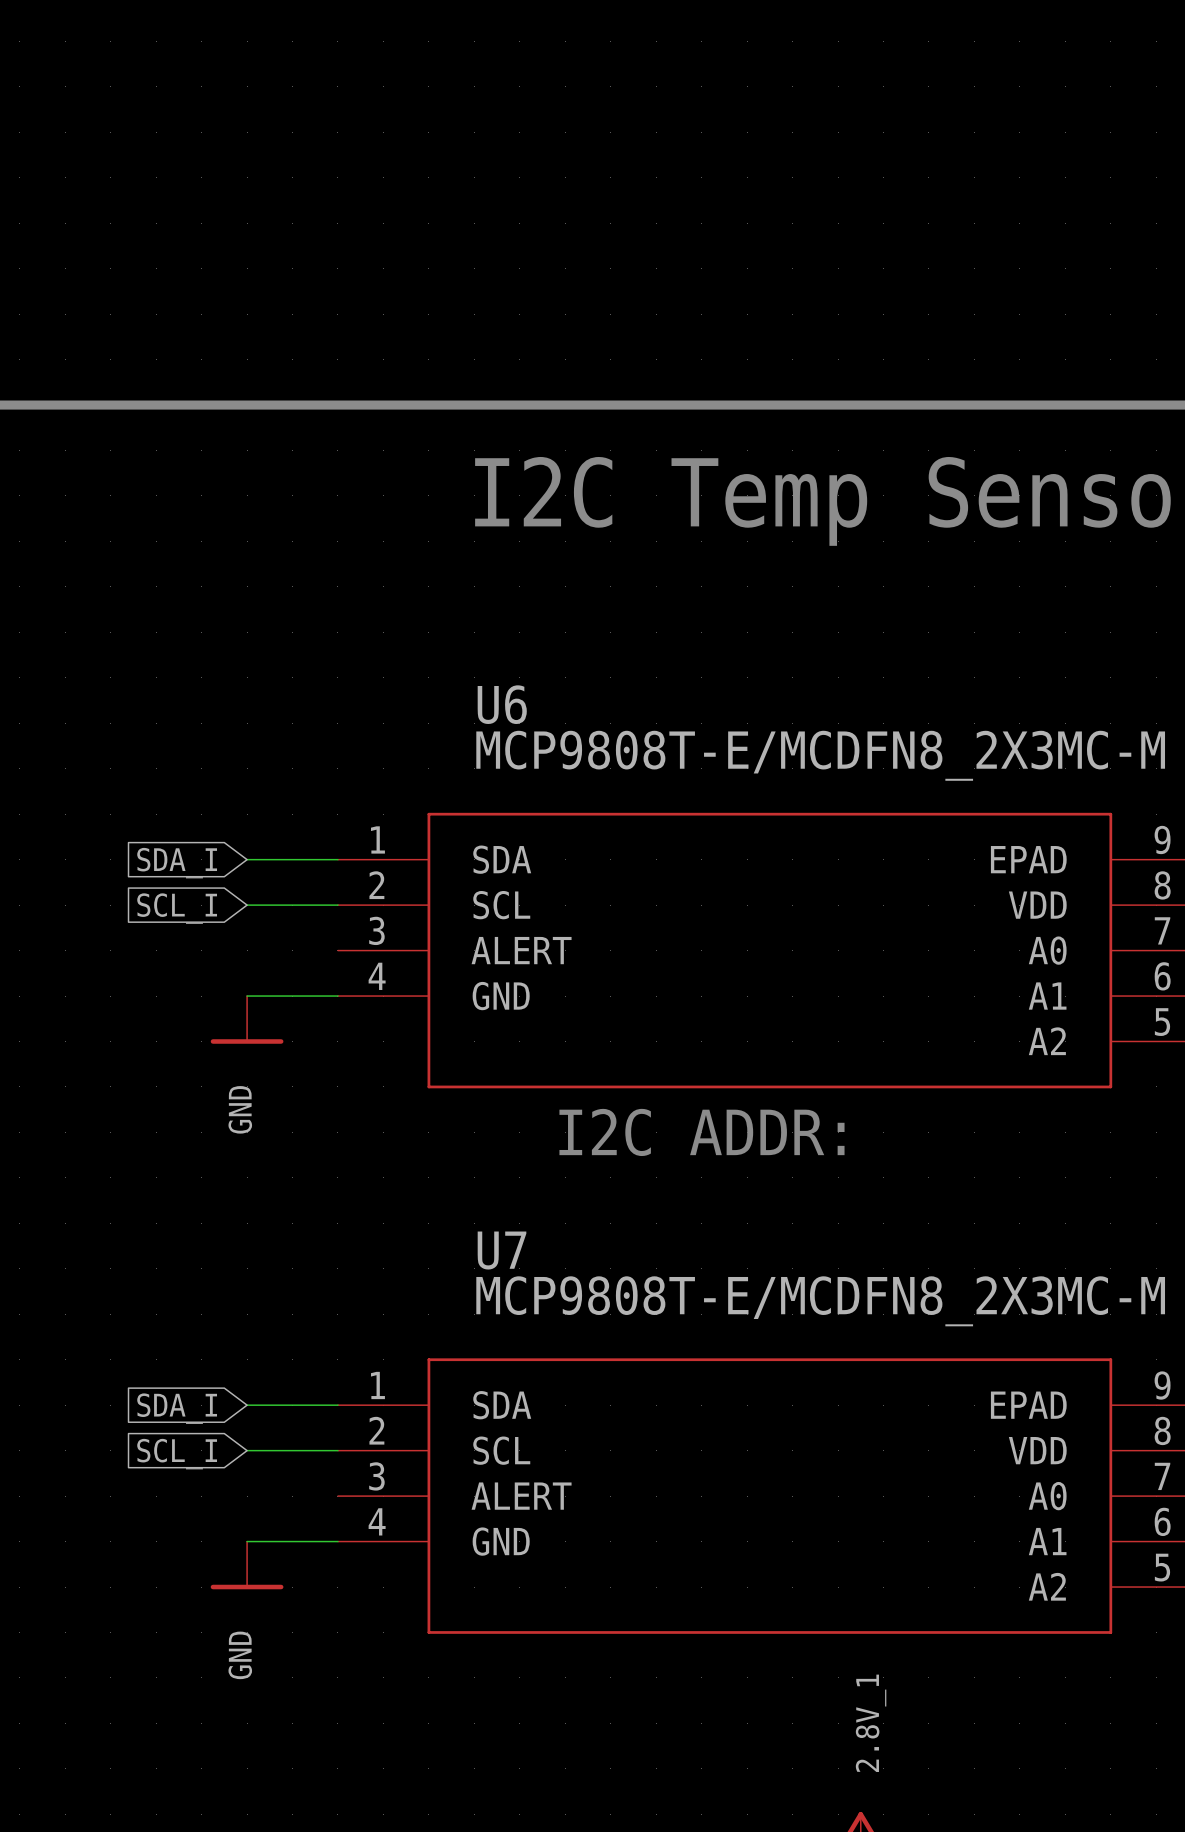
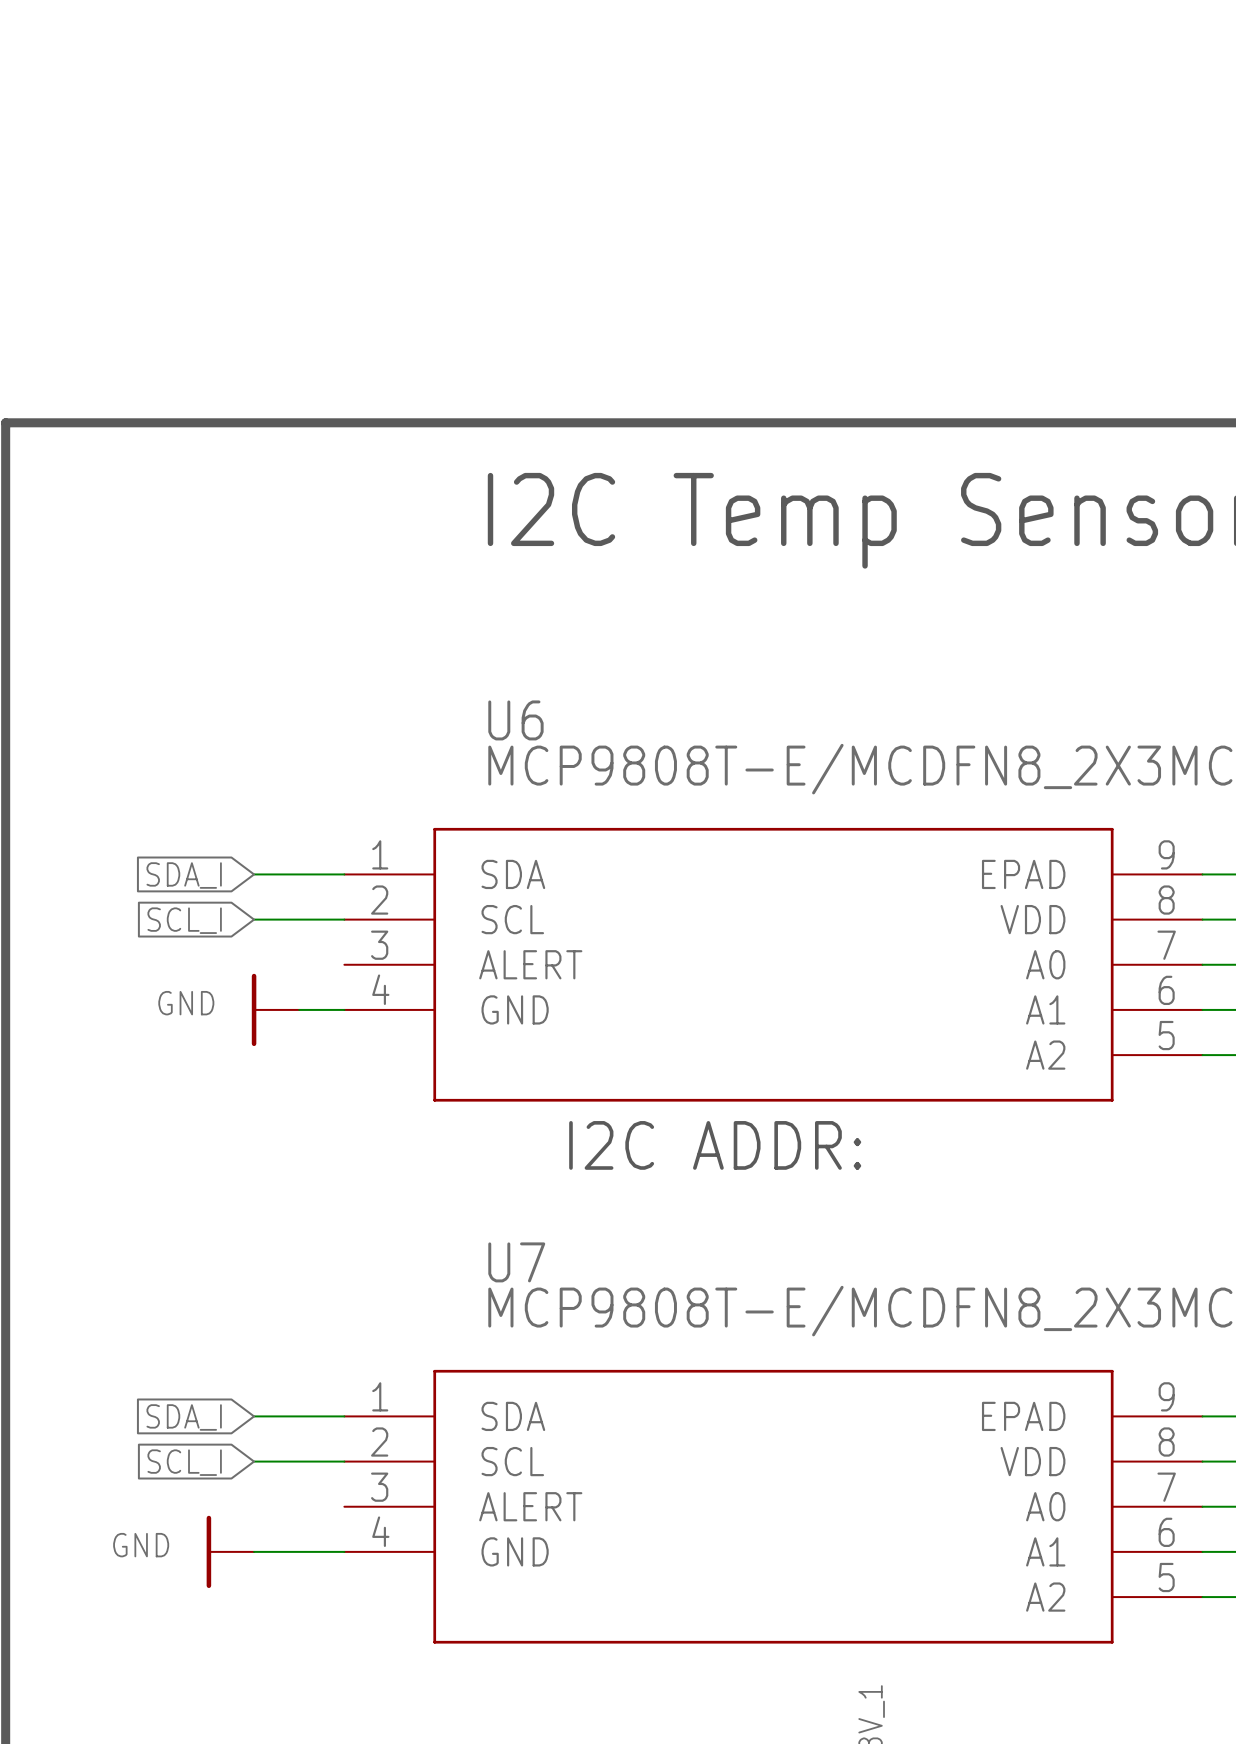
power symbol rotation: 0° (247, 1041) -> 90° clockwise (254, 1009)
power symbol rotation: 0° (247, 1587) -> 90° clockwise (208, 1551)

